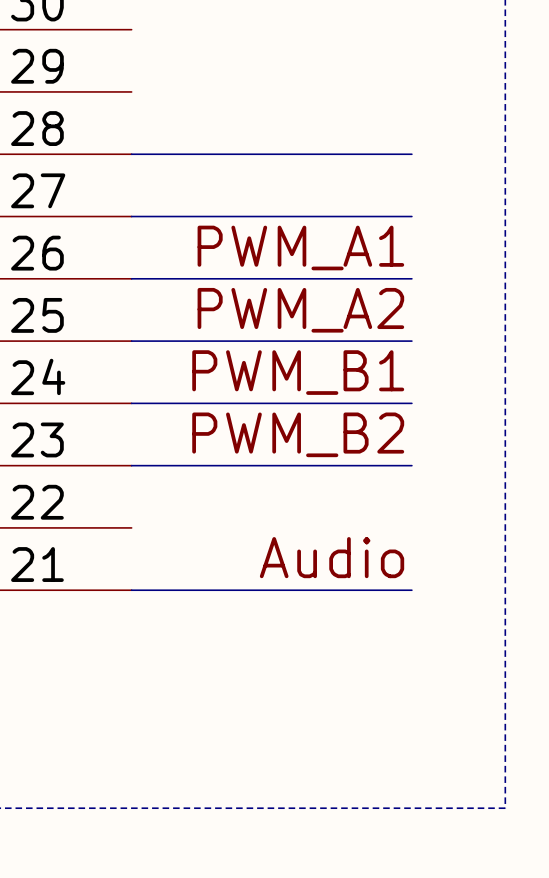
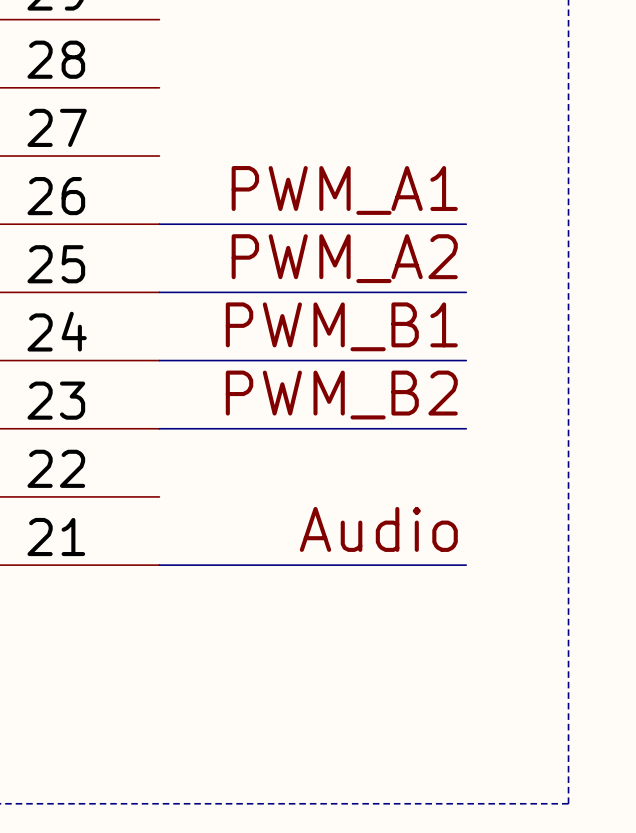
wire: (131, 154) (411, 154) -> none
wire: (131, 216) (411, 216) -> none

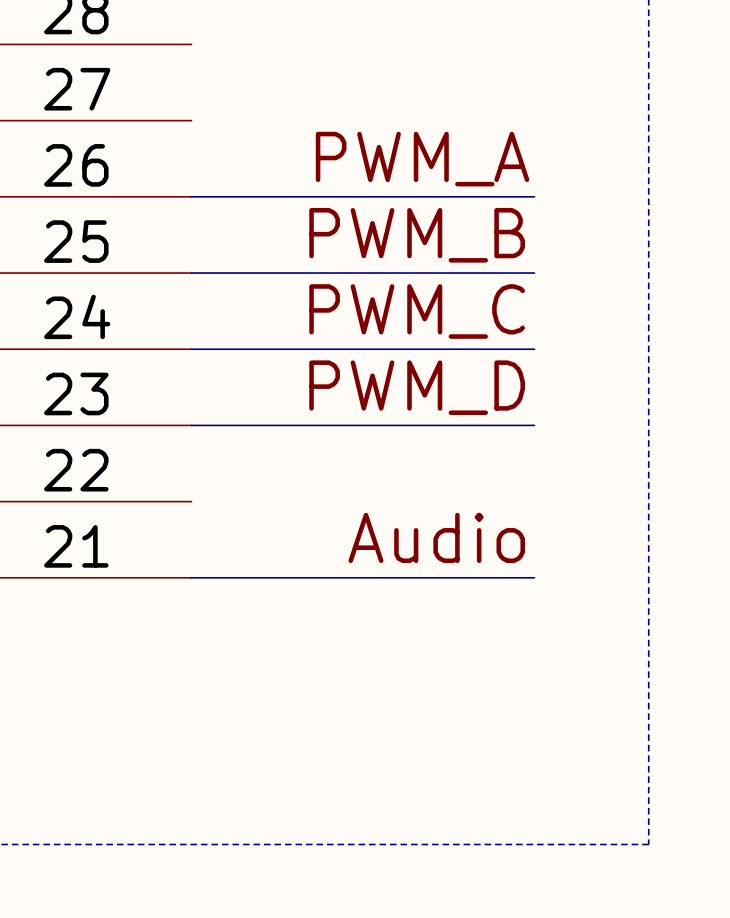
label: PWM_A1 (344, 190) -> PWM_A (422, 159)
label: PWM_A2 (344, 258) -> PWM_B (417, 235)
label: PWM_B1 (341, 326) -> PWM_C (417, 311)
label: PWM_B2 (341, 395) -> PWM_D (417, 387)

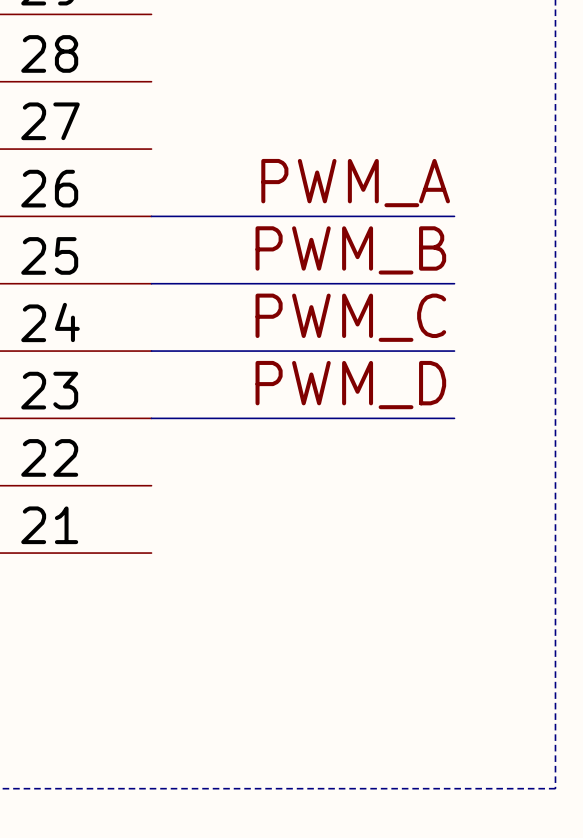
label: Audio (436, 537) -> none
wire: (191, 577) (534, 577) -> none

